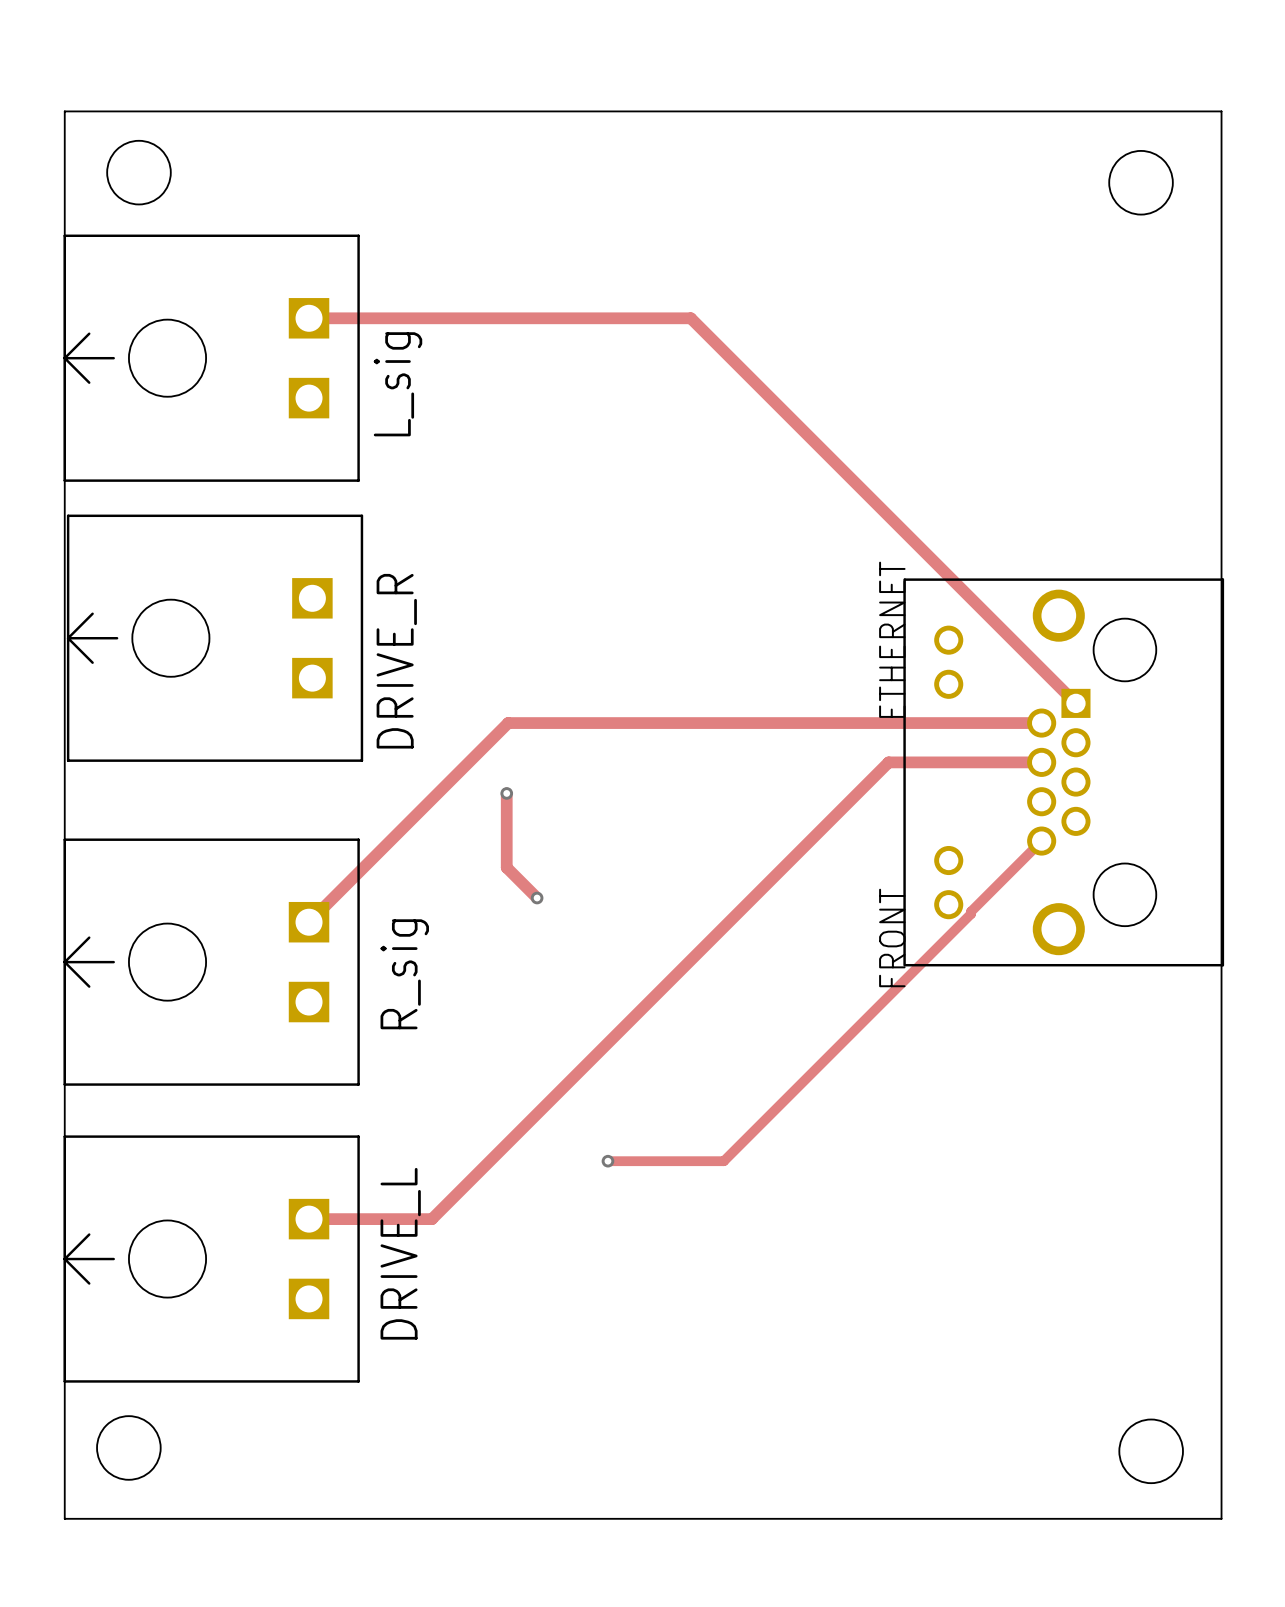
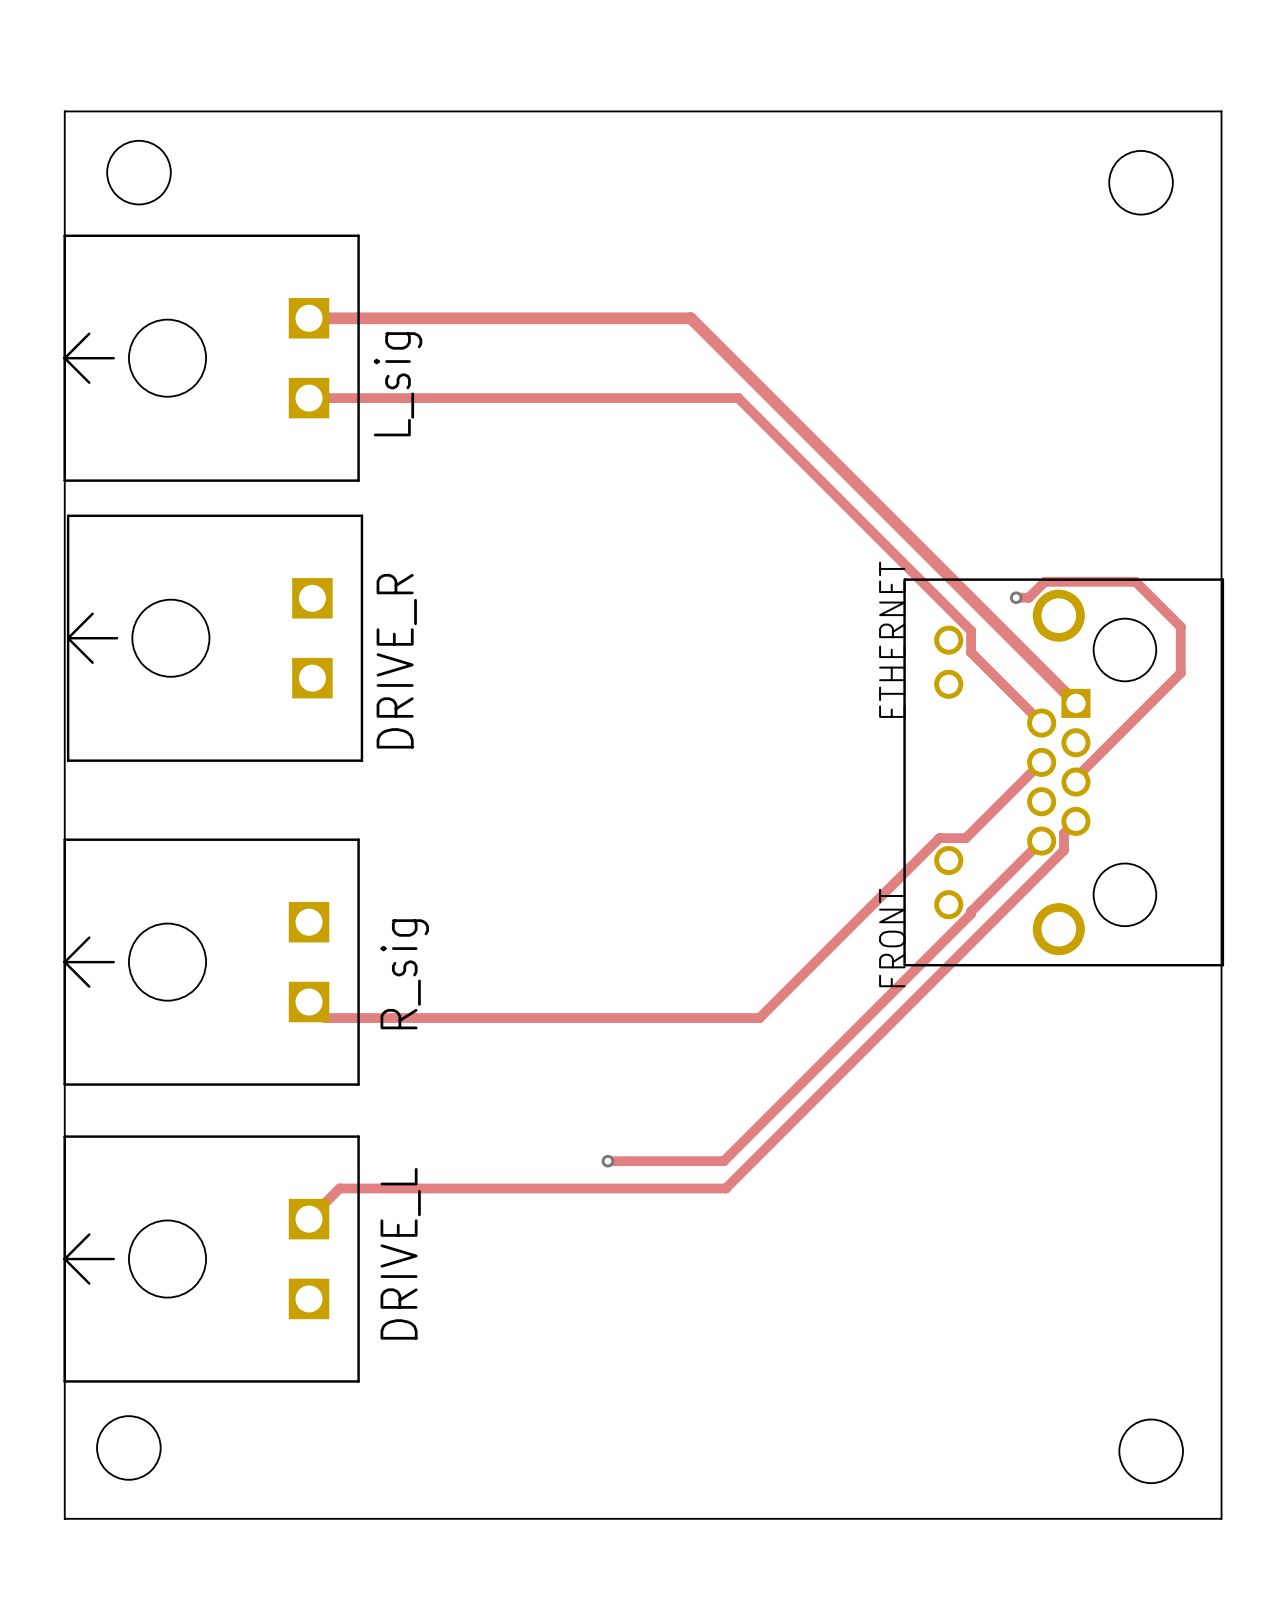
track: none -> (1016, 597) (1028, 597) (1044, 581) (1135, 581) (1180, 626) (1180, 673) (1075, 777) (1075, 782)
via: none -> (1016, 597)
track: (1041, 723) (508, 723) (309, 922) -> (1041, 723) (971, 652) (971, 630) (738, 398) (309, 398)
track: (1041, 762) (888, 762) (431, 1219) (309, 1219) -> (1075, 821) (1064, 833) (1064, 850) (725, 1188) (339, 1188) (309, 1219)
track: none -> (1041, 762) (965, 838) (939, 838) (759, 1018) (325, 1018) (309, 1002)
track: (506, 793) (506, 867) (537, 898) -> none
via: (506, 793) -> none
via: (537, 898) -> none

